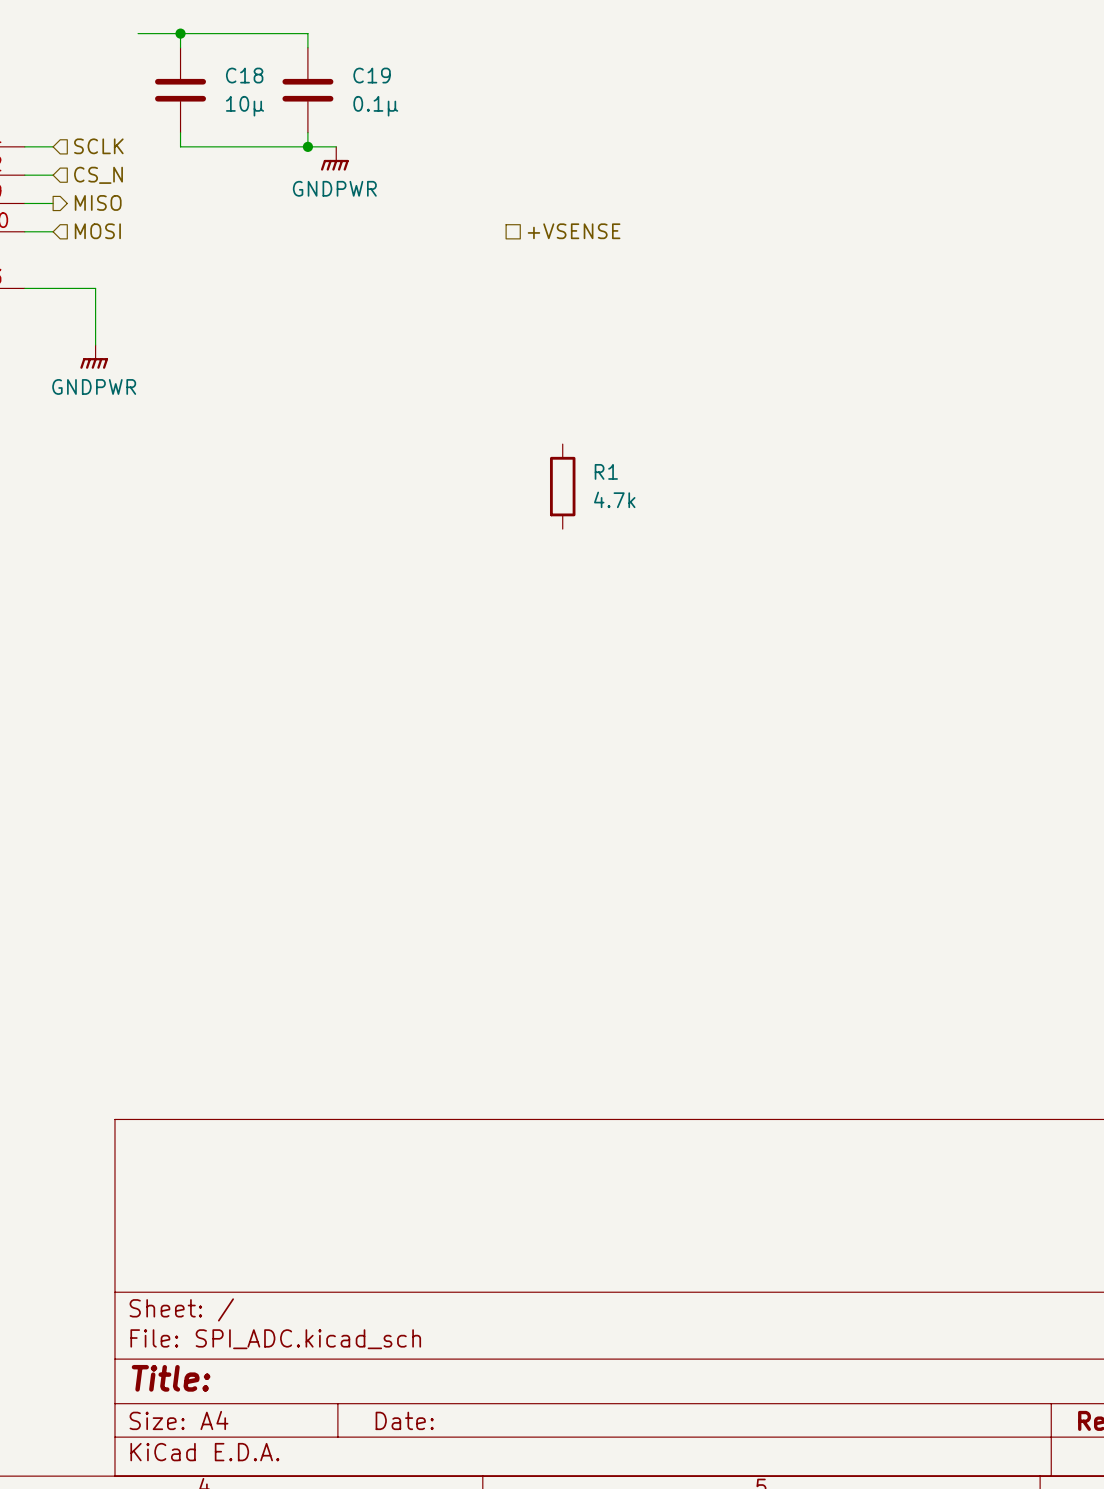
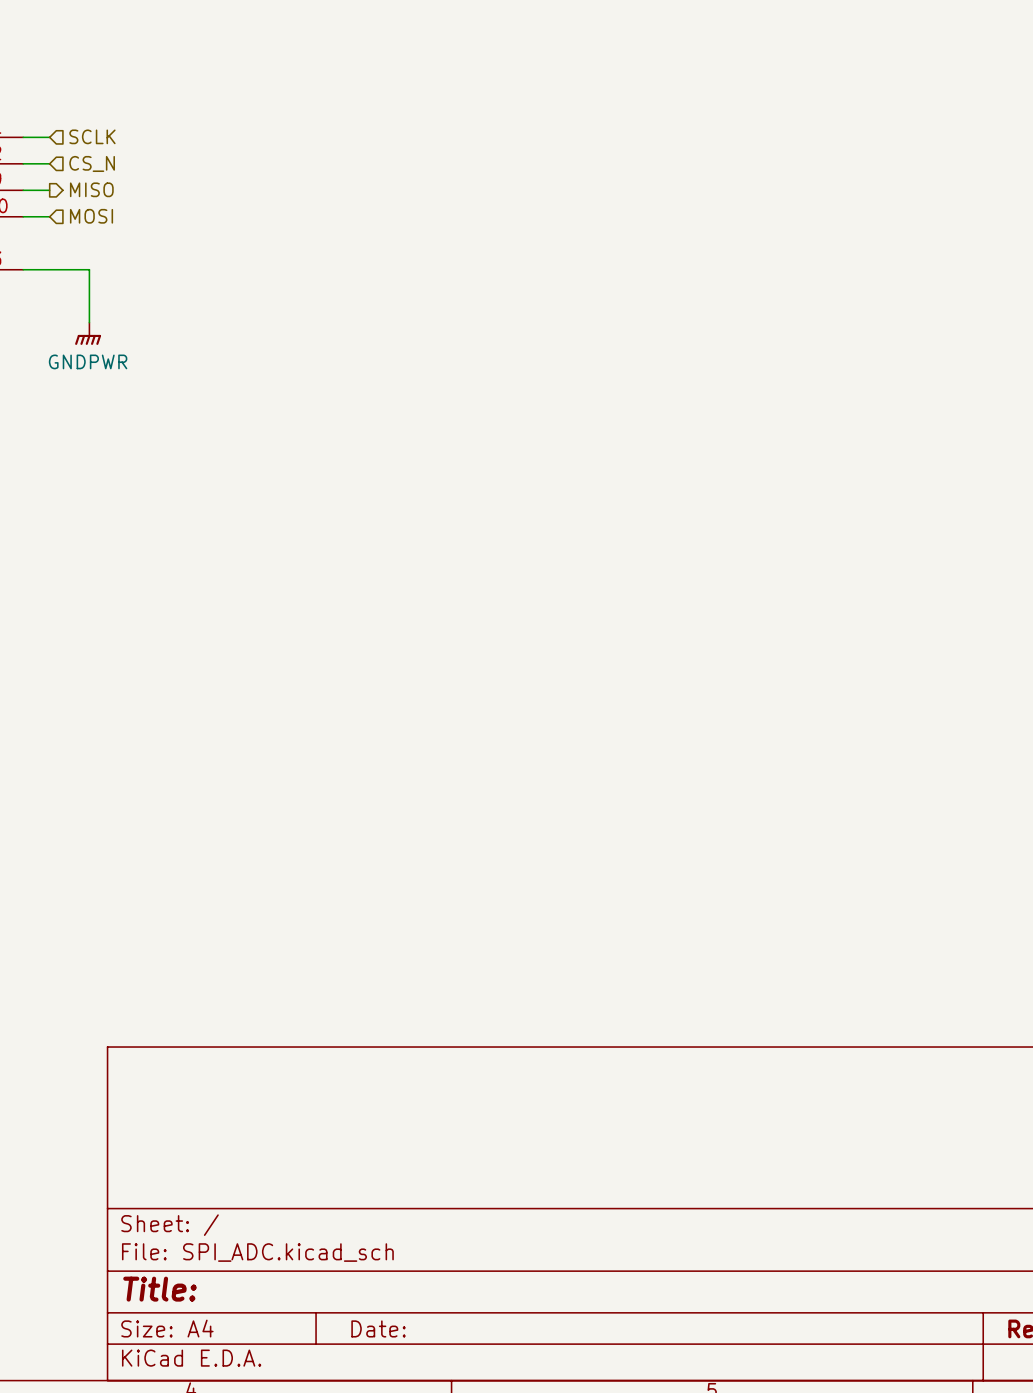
wire: (138, 33) (307, 33) (307, 47) -> none
wire: (180, 33) (180, 47) -> none
junction: (180, 33) -> none
C18: 10μ (180, 90) -> none
C19: 0.1μ (307, 90) -> none
wire: (180, 132) (180, 146) (336, 146) -> none
wire: (307, 132) (307, 146) -> none
junction: (307, 146) -> none
power symbol: GNDPWR (334, 158) -> none
hierarchical label: +VSENSE (574, 231) -> none
R1: 4.7k (562, 486) -> none

